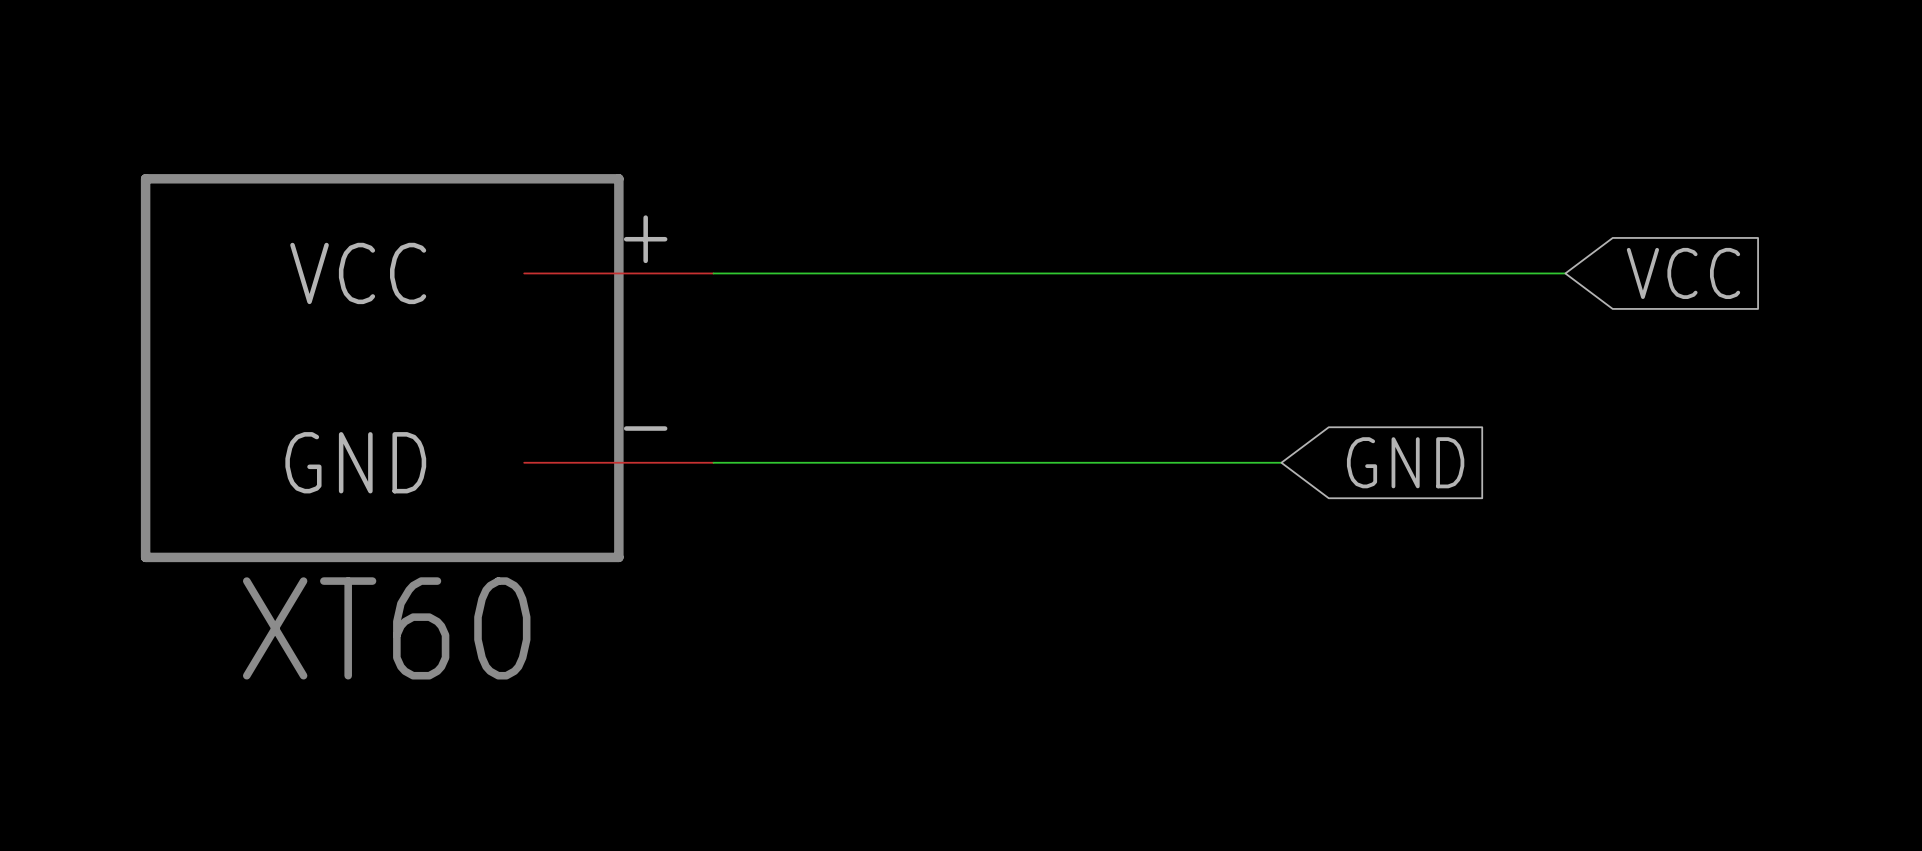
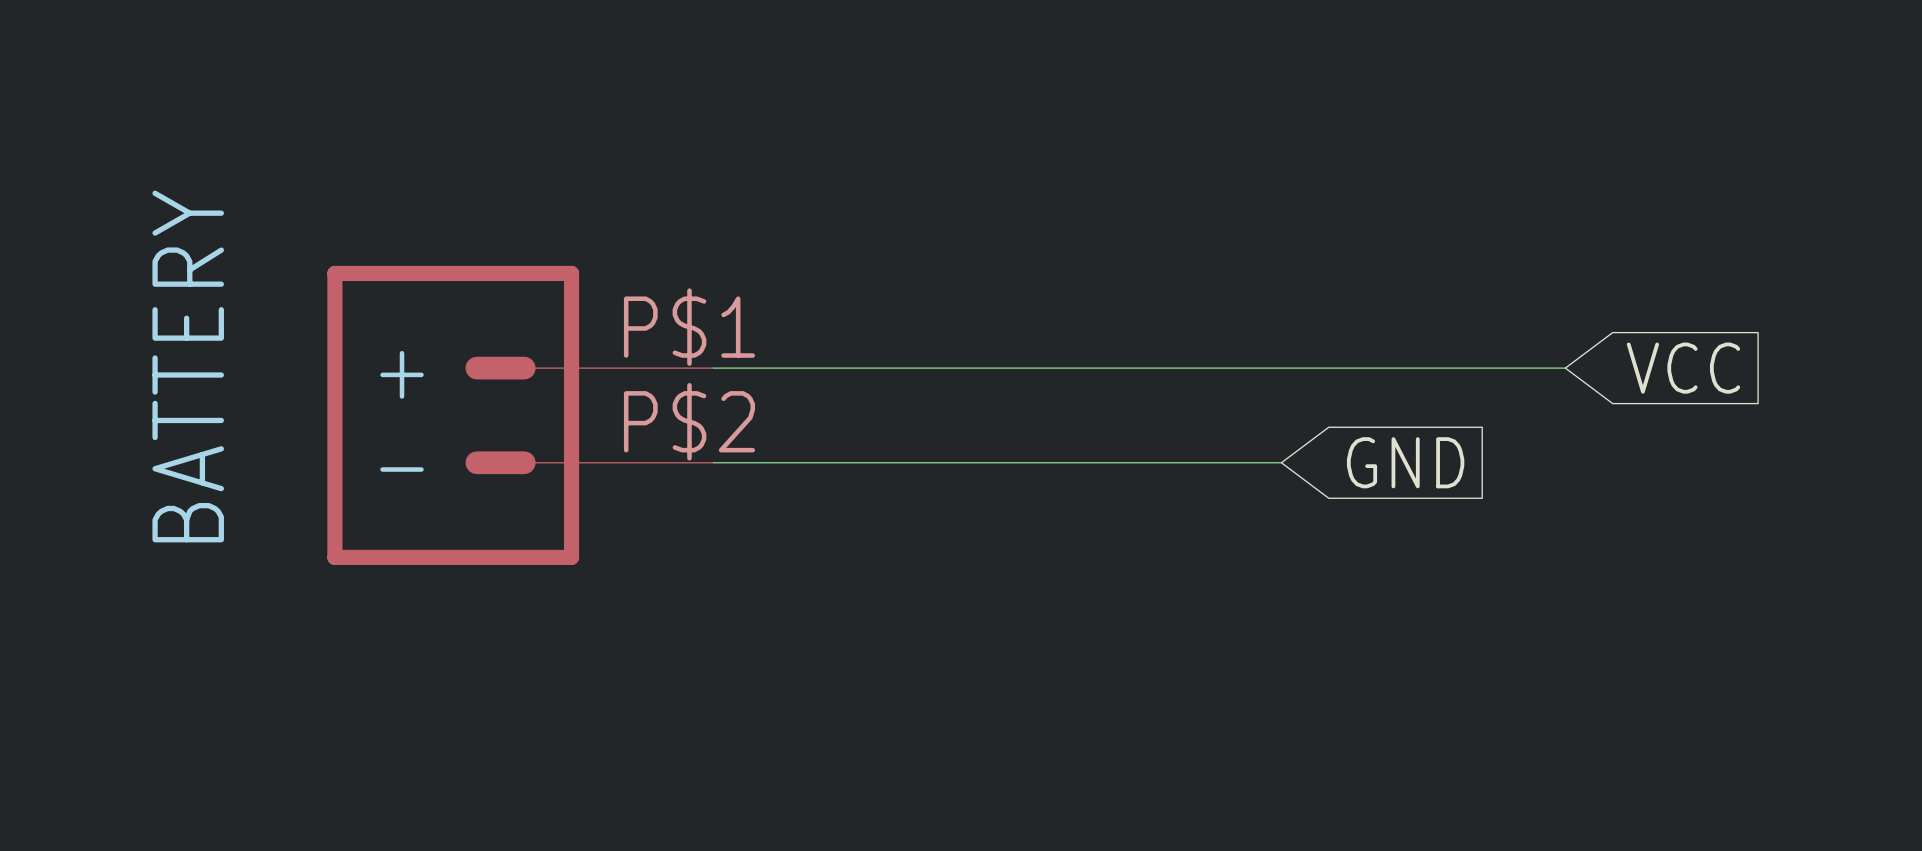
wire: (713, 273) (1565, 273) -> (713, 368) (1565, 368)
global label position: VCC (1683, 273) -> VCC (1683, 368)
part: (427, 368) -> none
BATTERY: none -> (520, 415)

